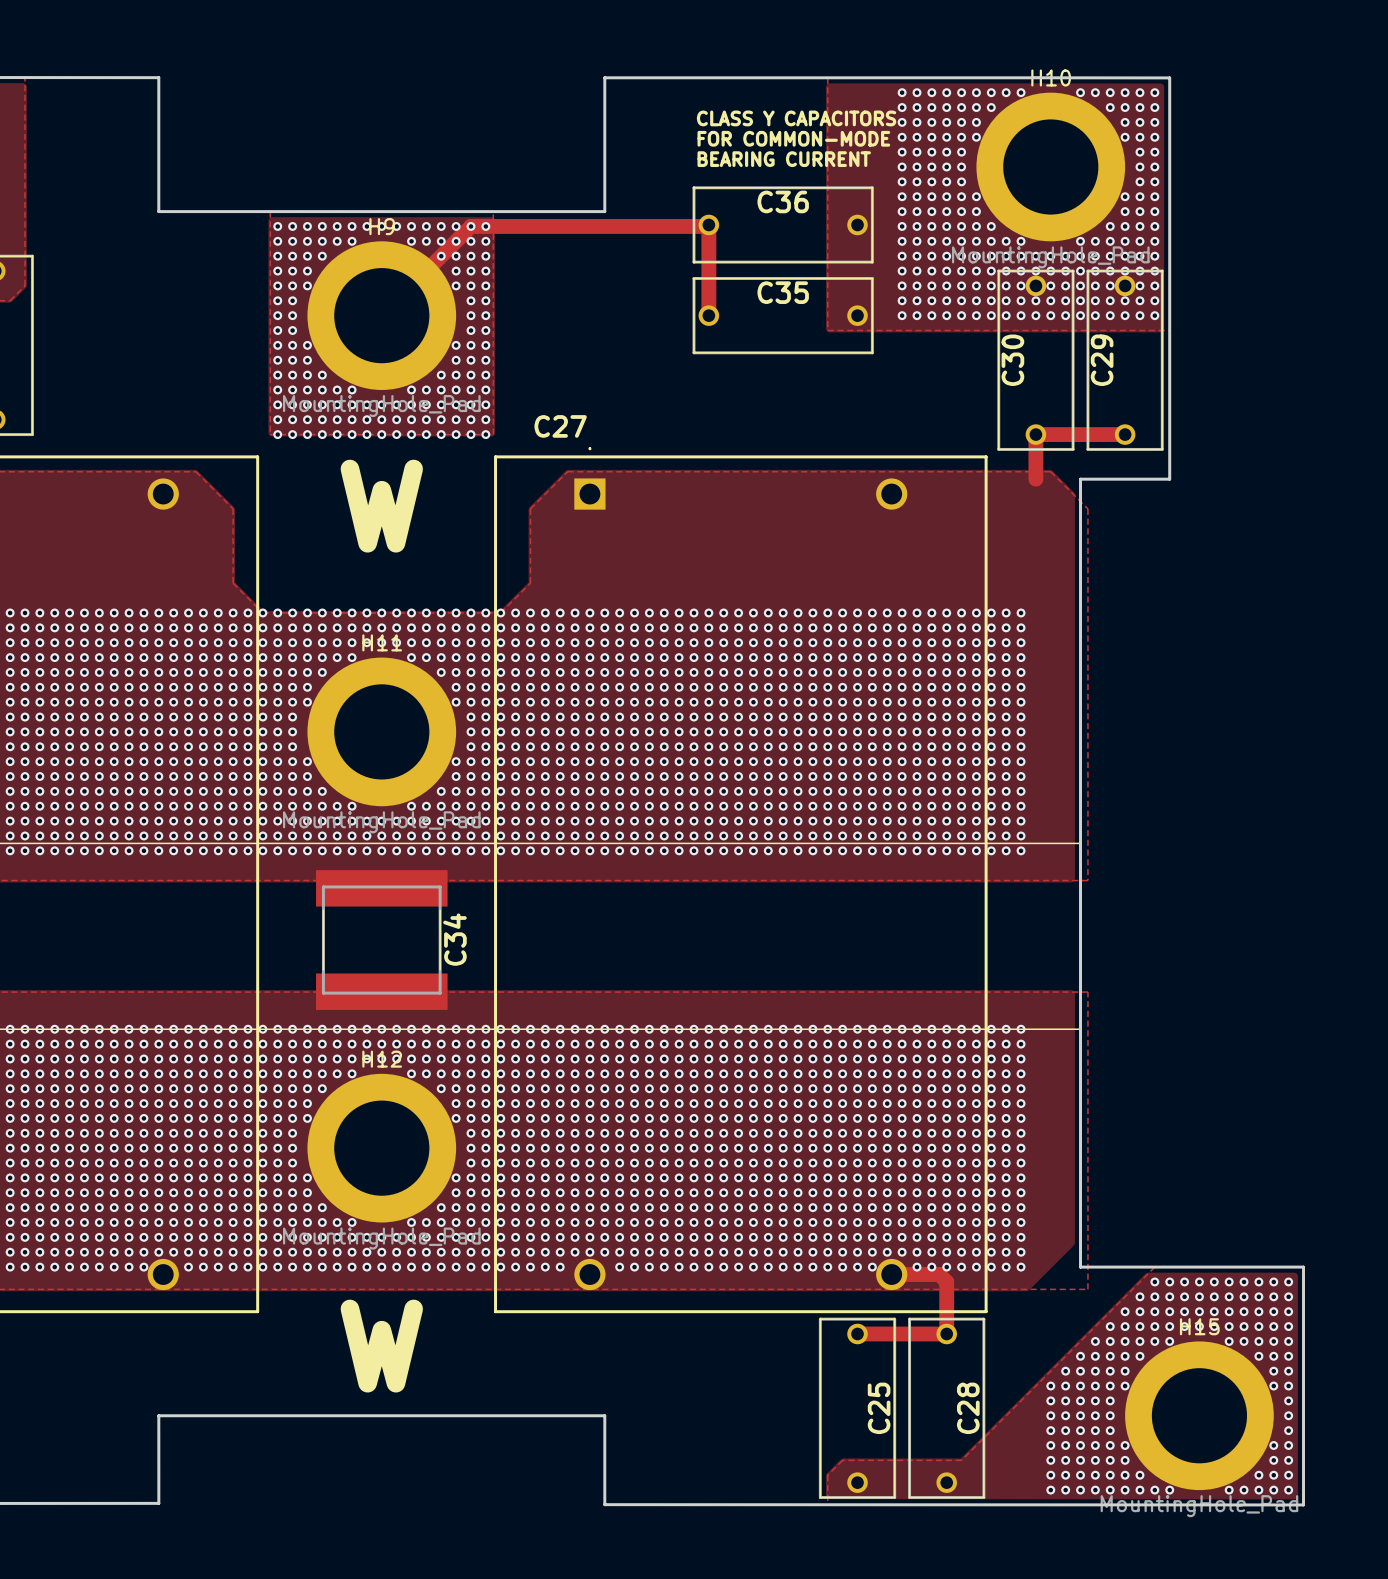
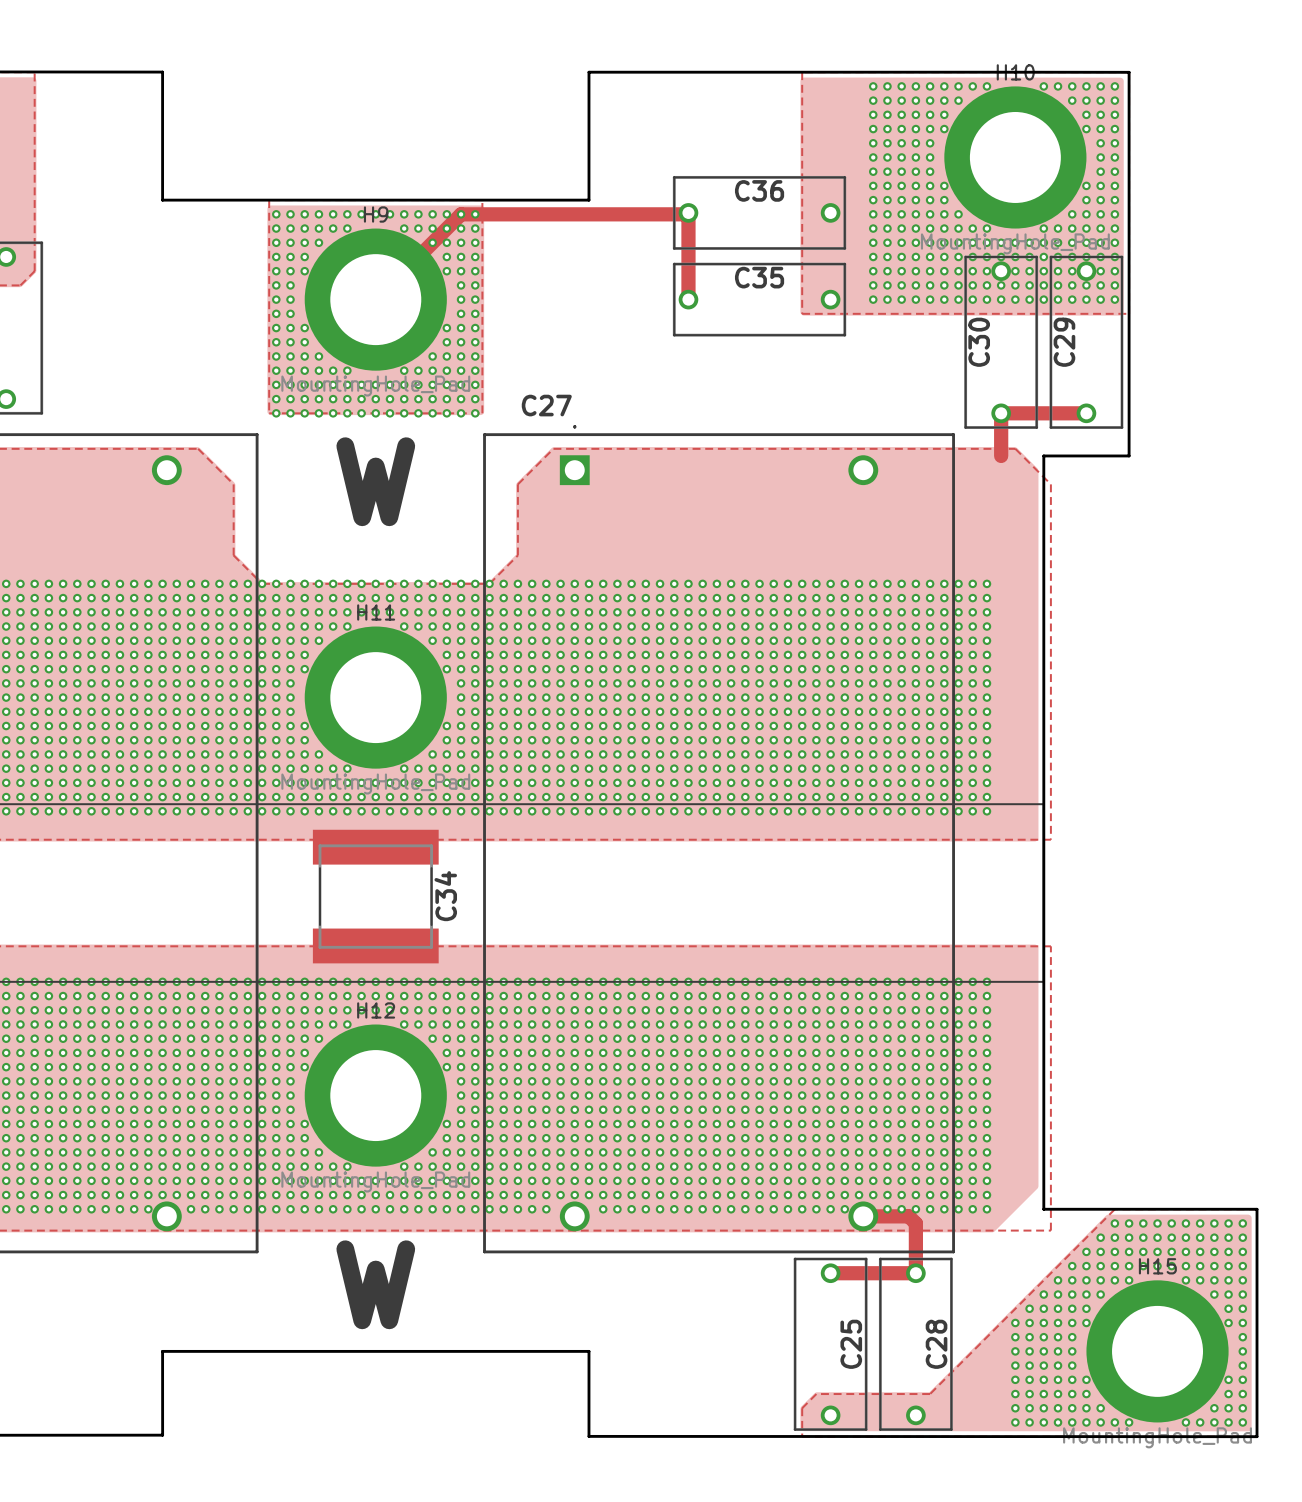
text: CLASS Y CAPACITORS (796, 118) -> none
text: FOR COMMON-MODE (793, 138) -> none
text: BEARING CURRENT (784, 159) -> none

